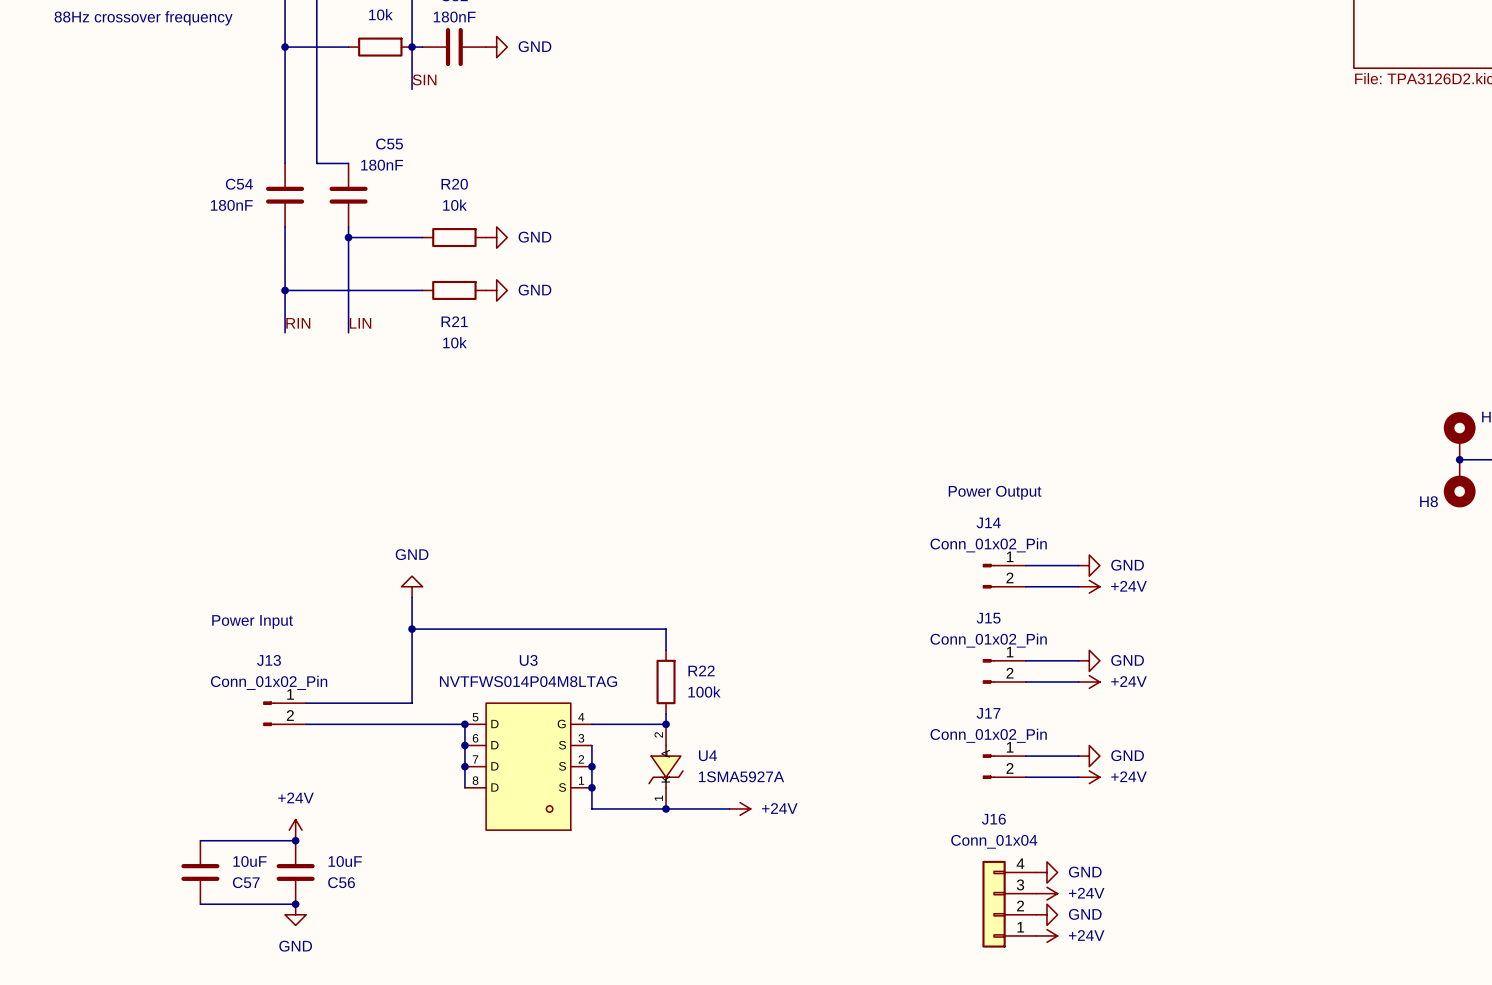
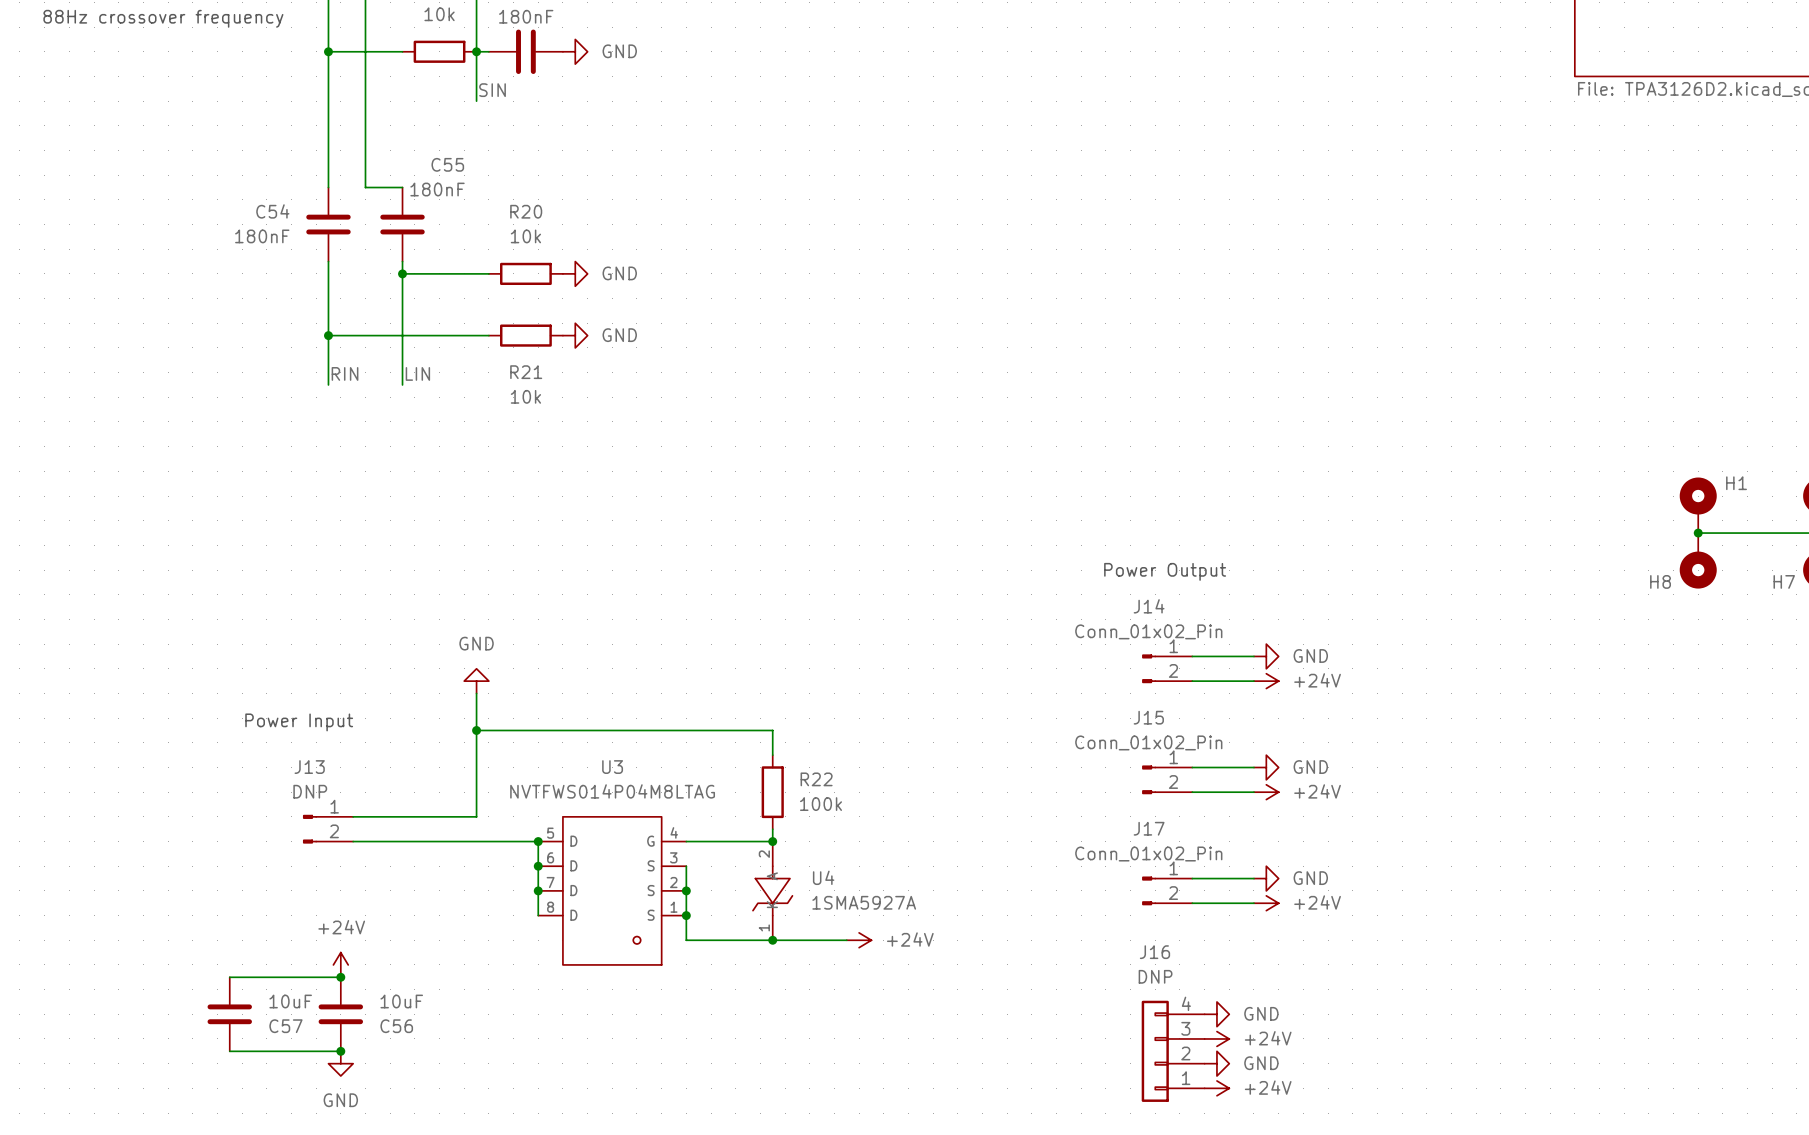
J13 value: Conn_01x02_Pin (269, 682) -> DNP (310, 791)
J16 value: Conn_01x04 (994, 841) -> DNP (1155, 976)

